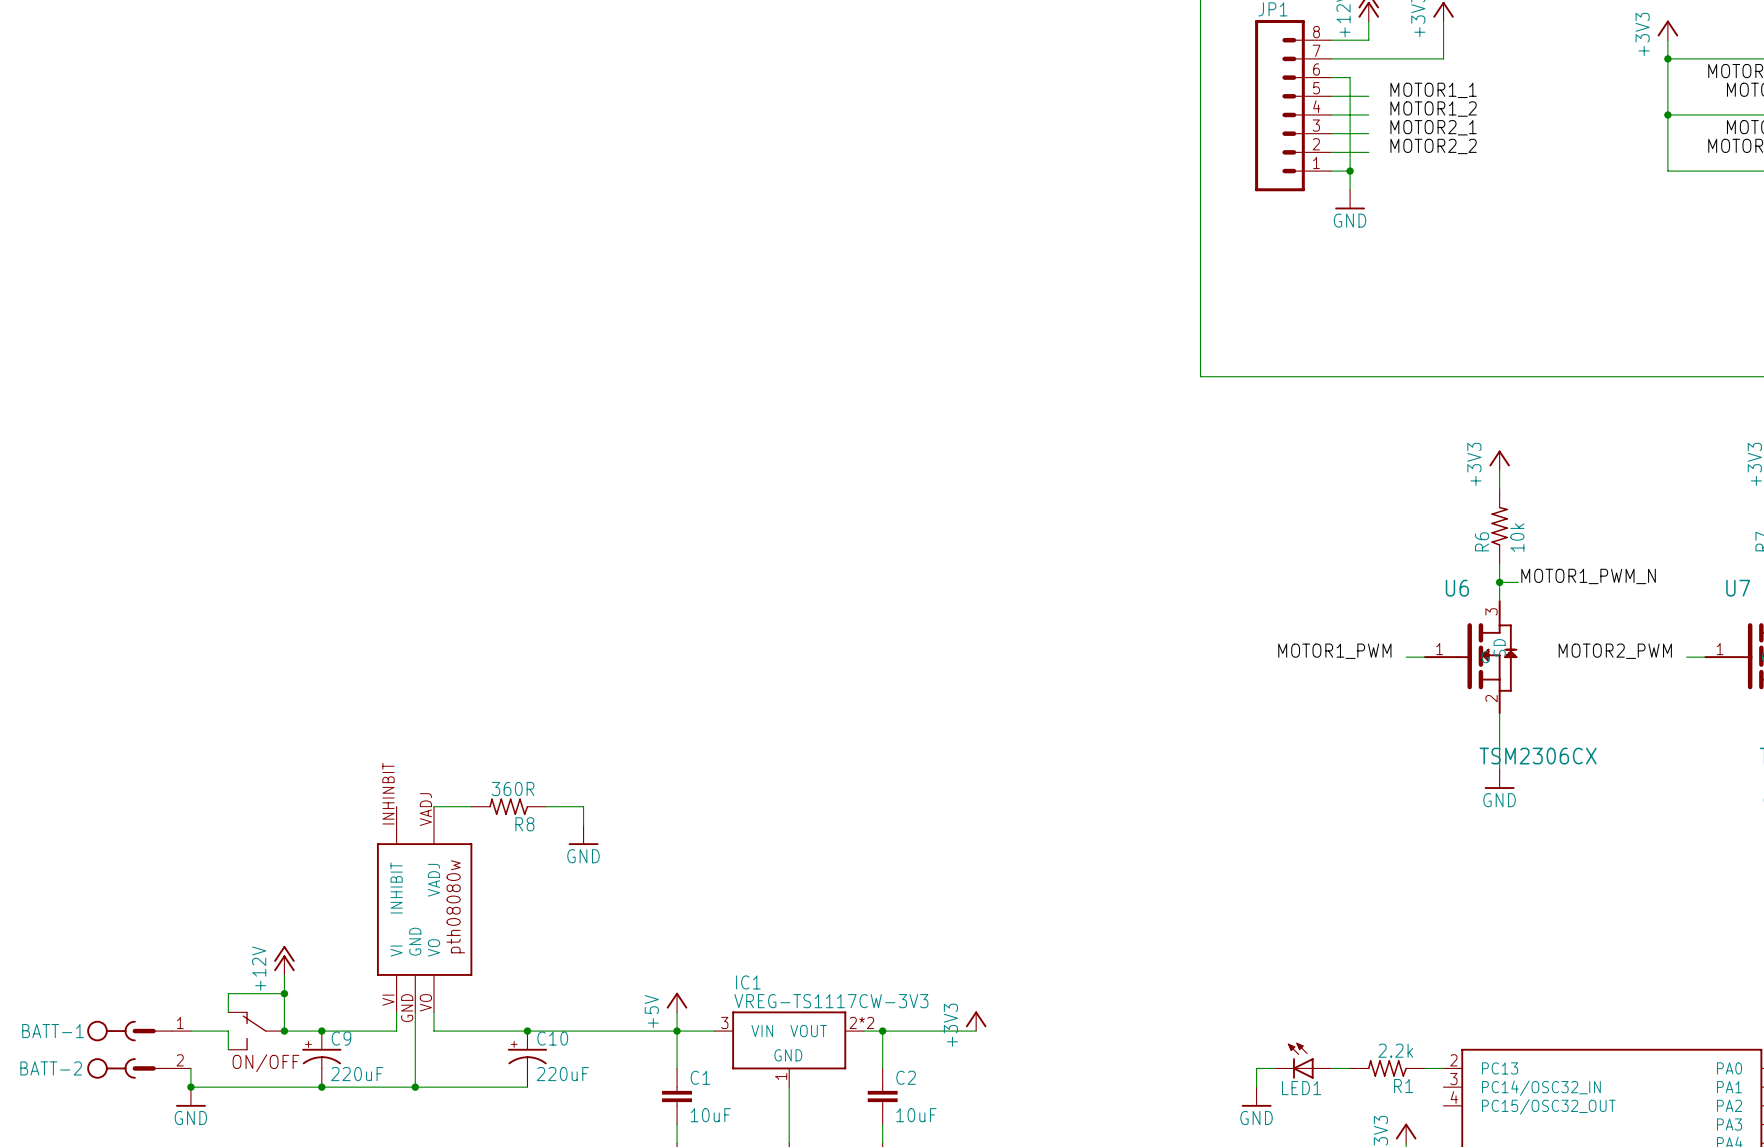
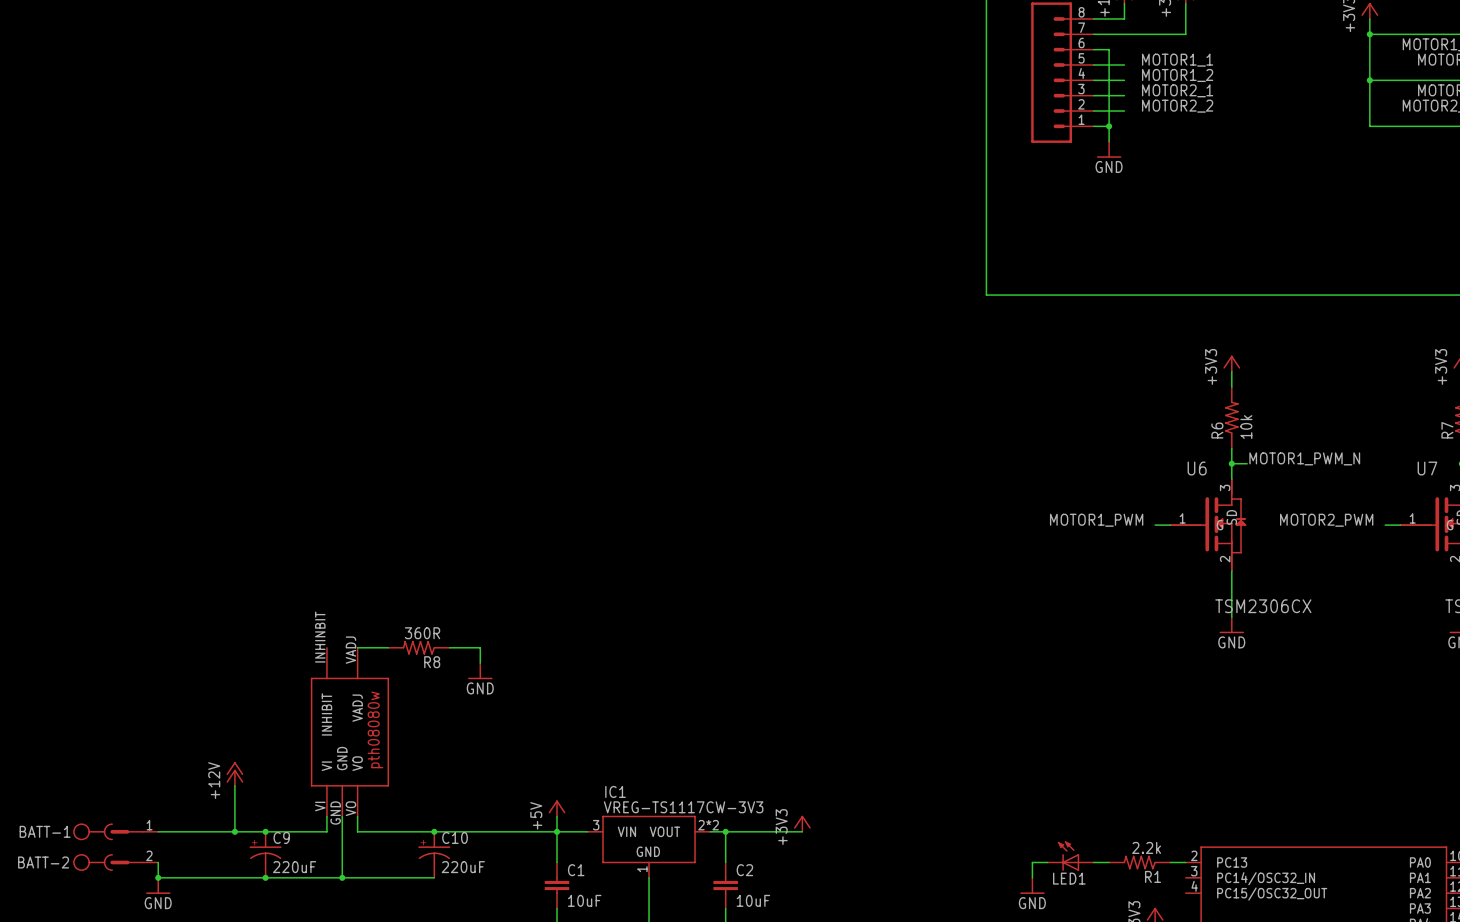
wire: (284, 993) (228, 993) (228, 1012) -> none
junction: (284, 993) -> none
wire: (228, 1031) (228, 1049) -> (188, 831) (234, 831)
ON/OFF: (256, 1031) -> none

